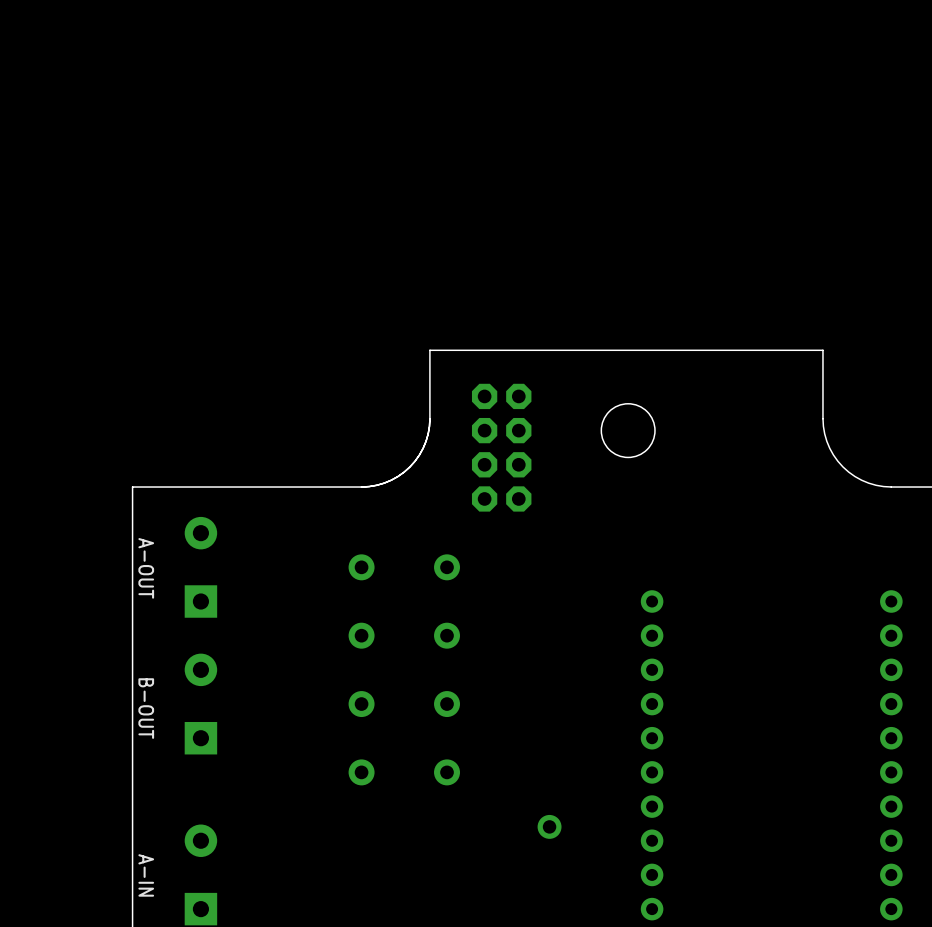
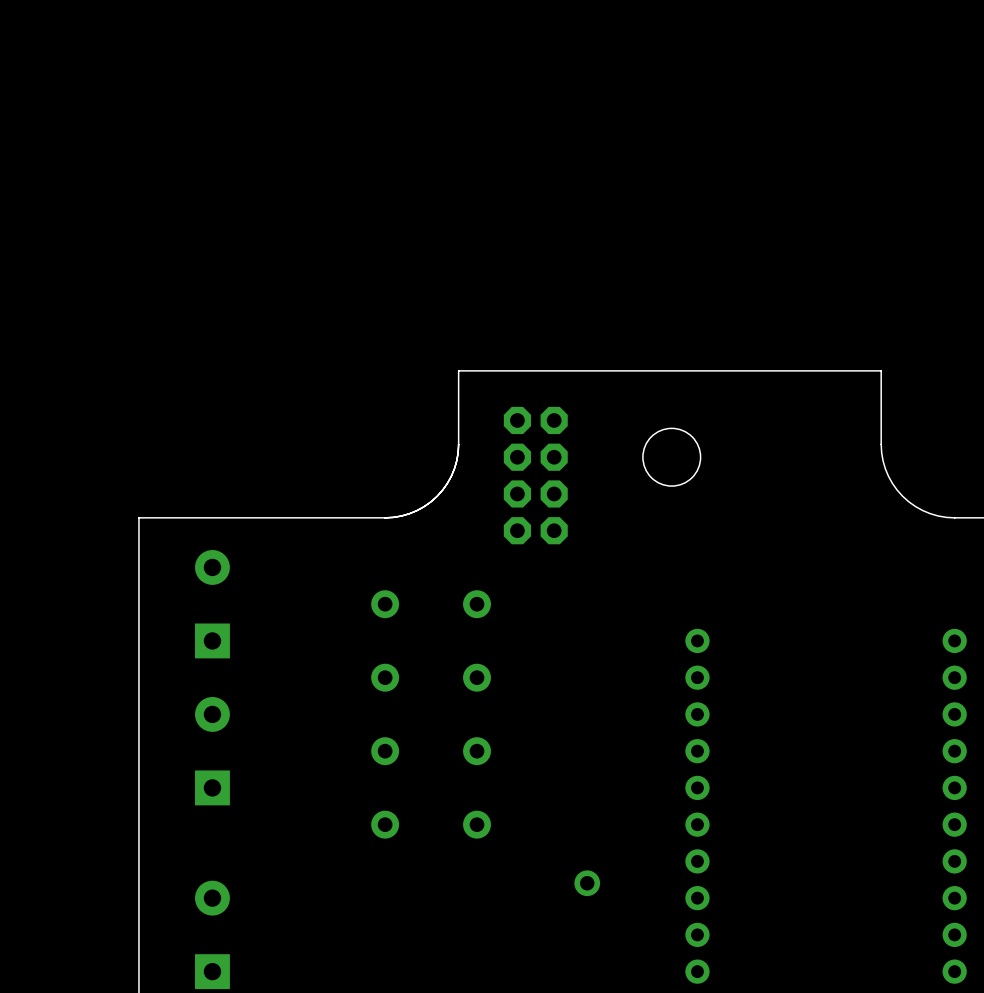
text: A-OUT (146, 568) -> none
text: B-OUT (146, 708) -> none
text: A-IN (146, 875) -> none

